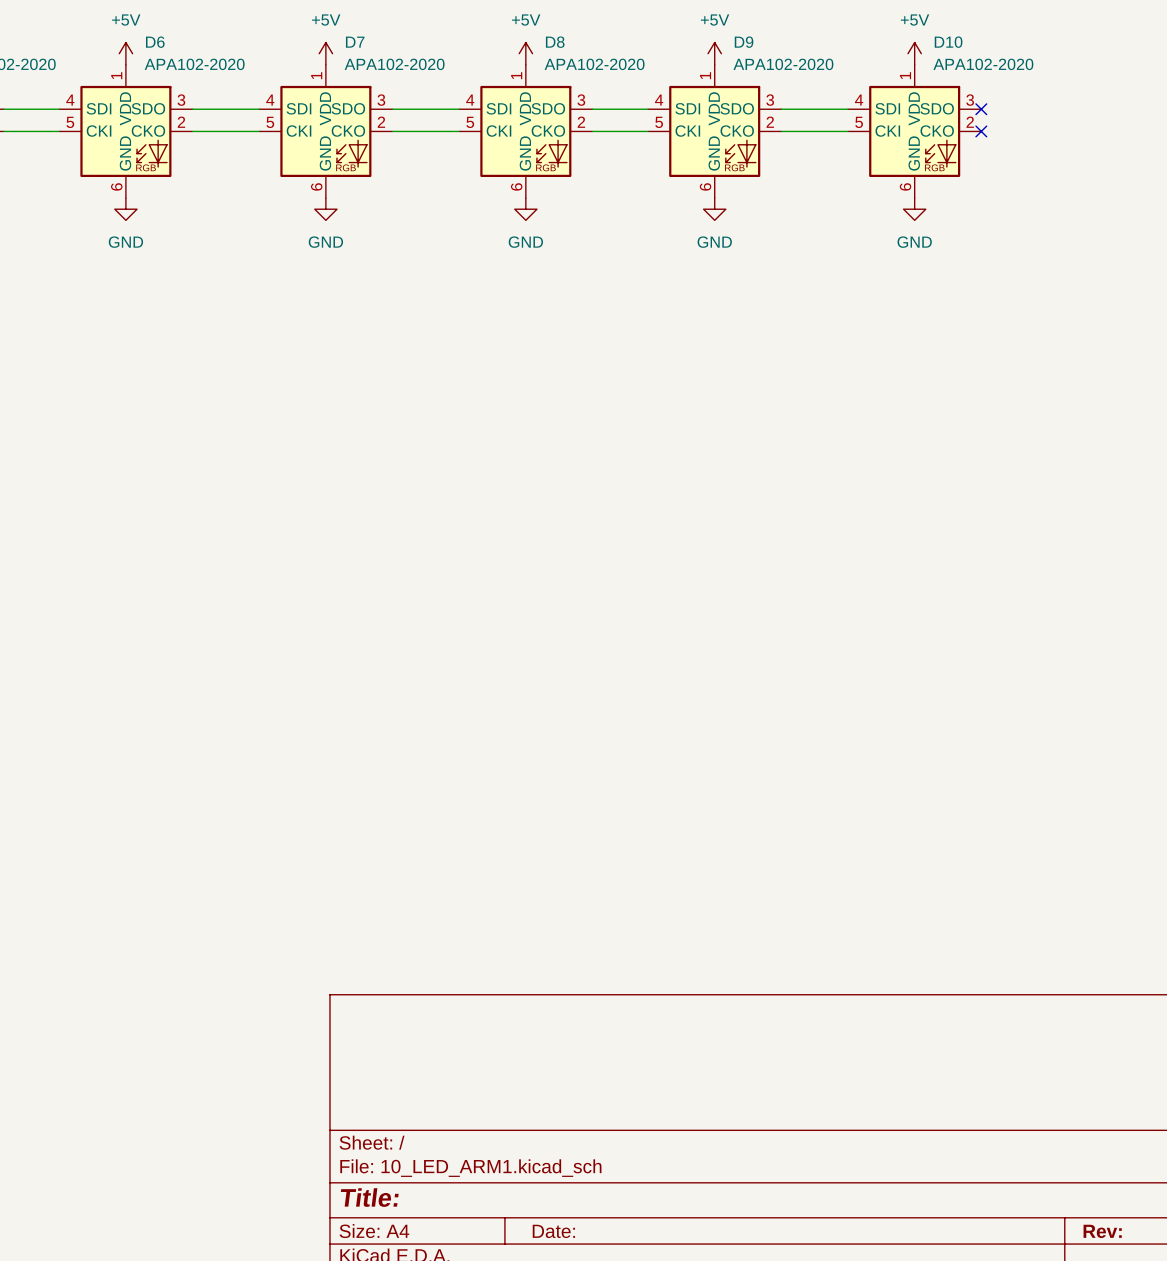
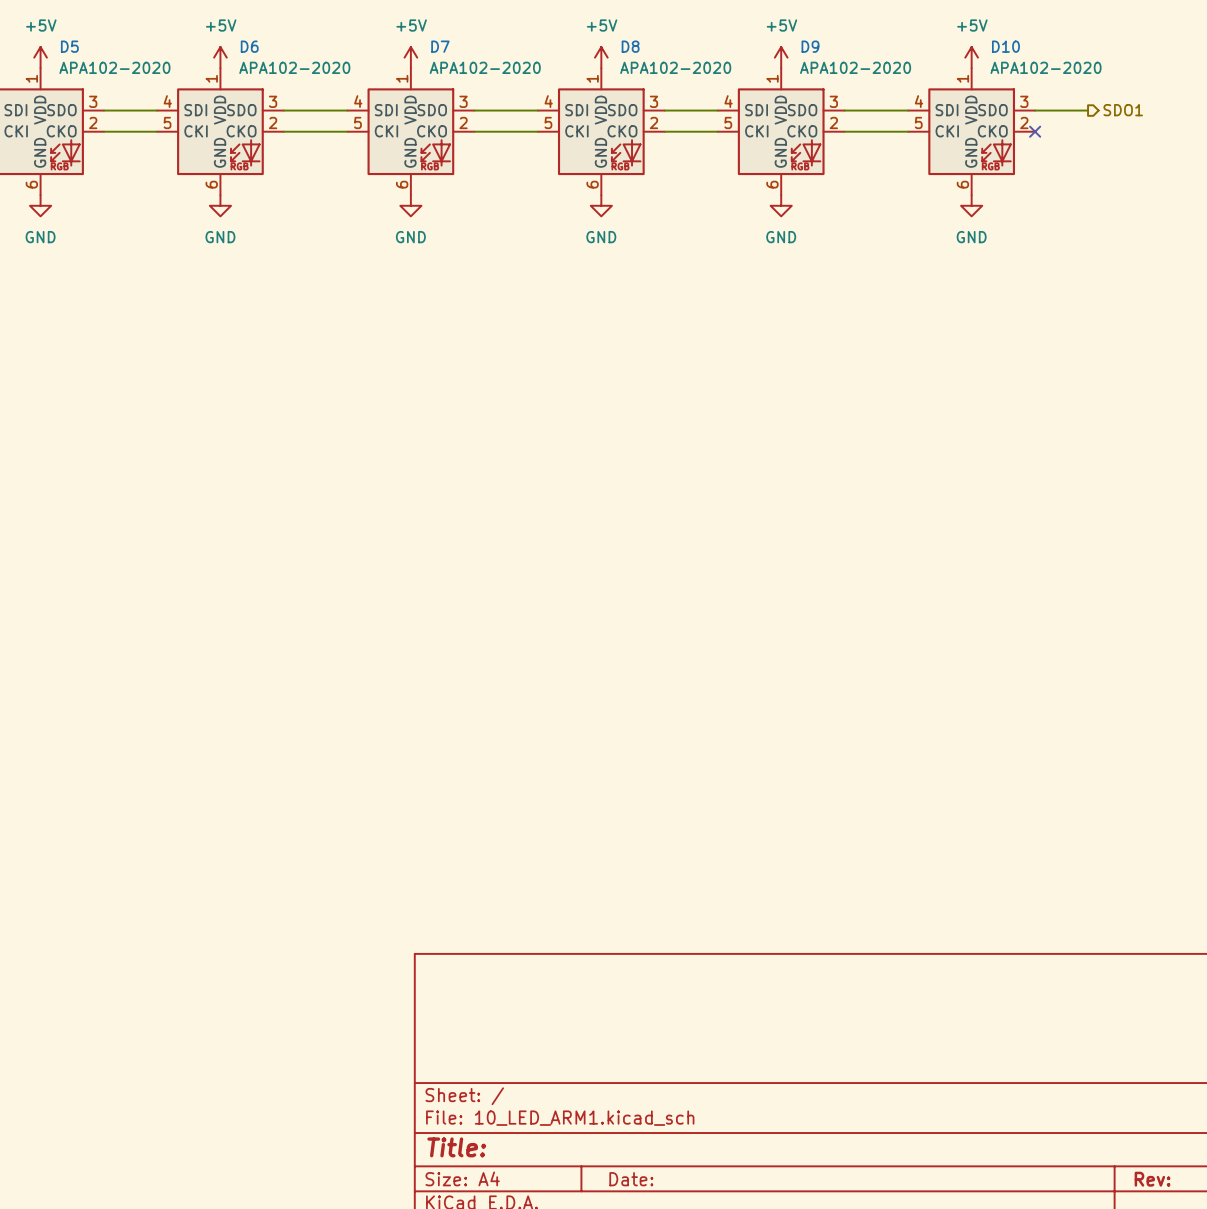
hierarchical label: none -> SDO1 (1123, 110)
wire: none -> (1035, 110) (1088, 110)
no-connect mark: (981, 109) -> none

